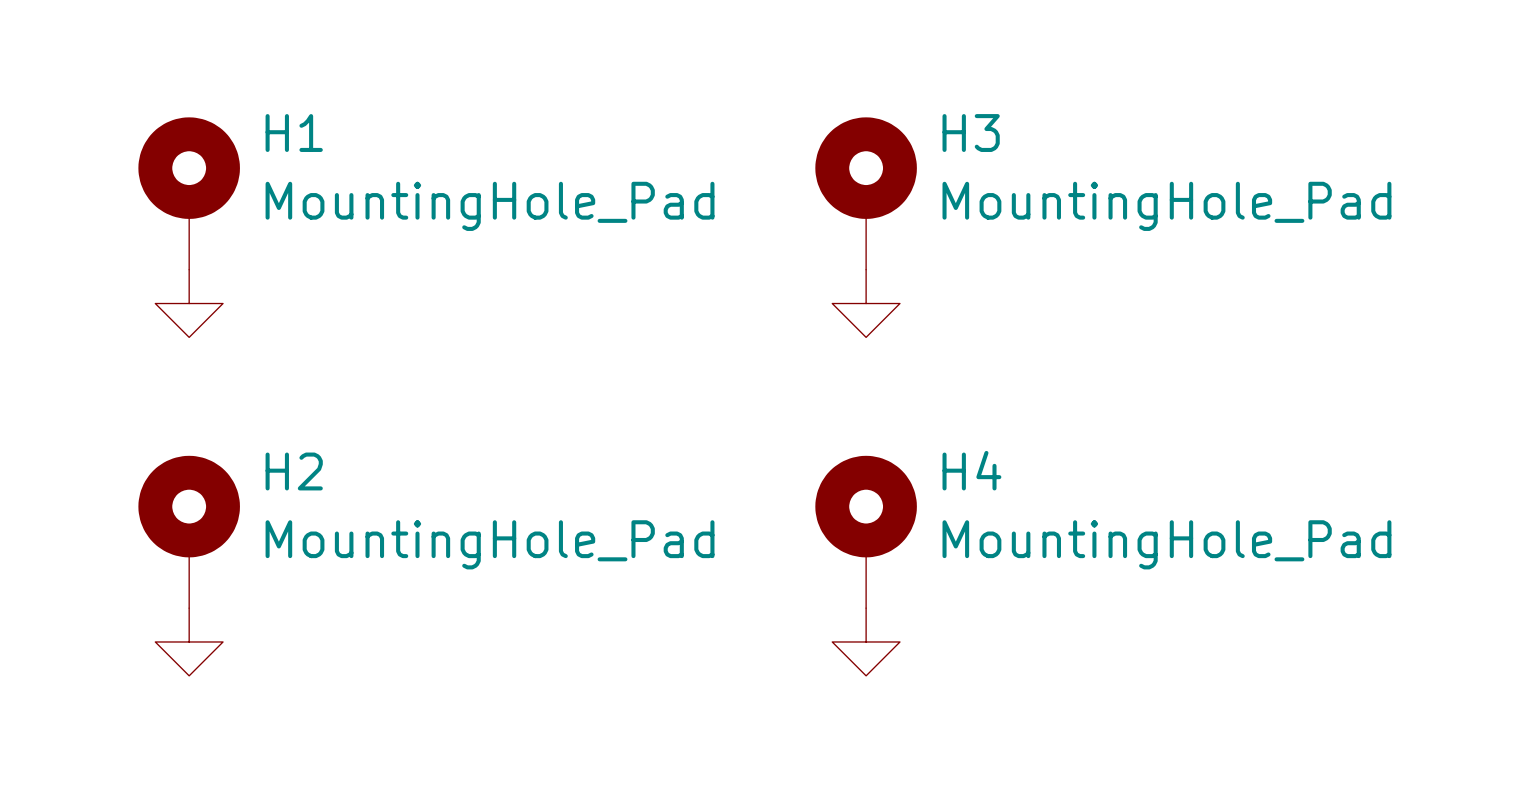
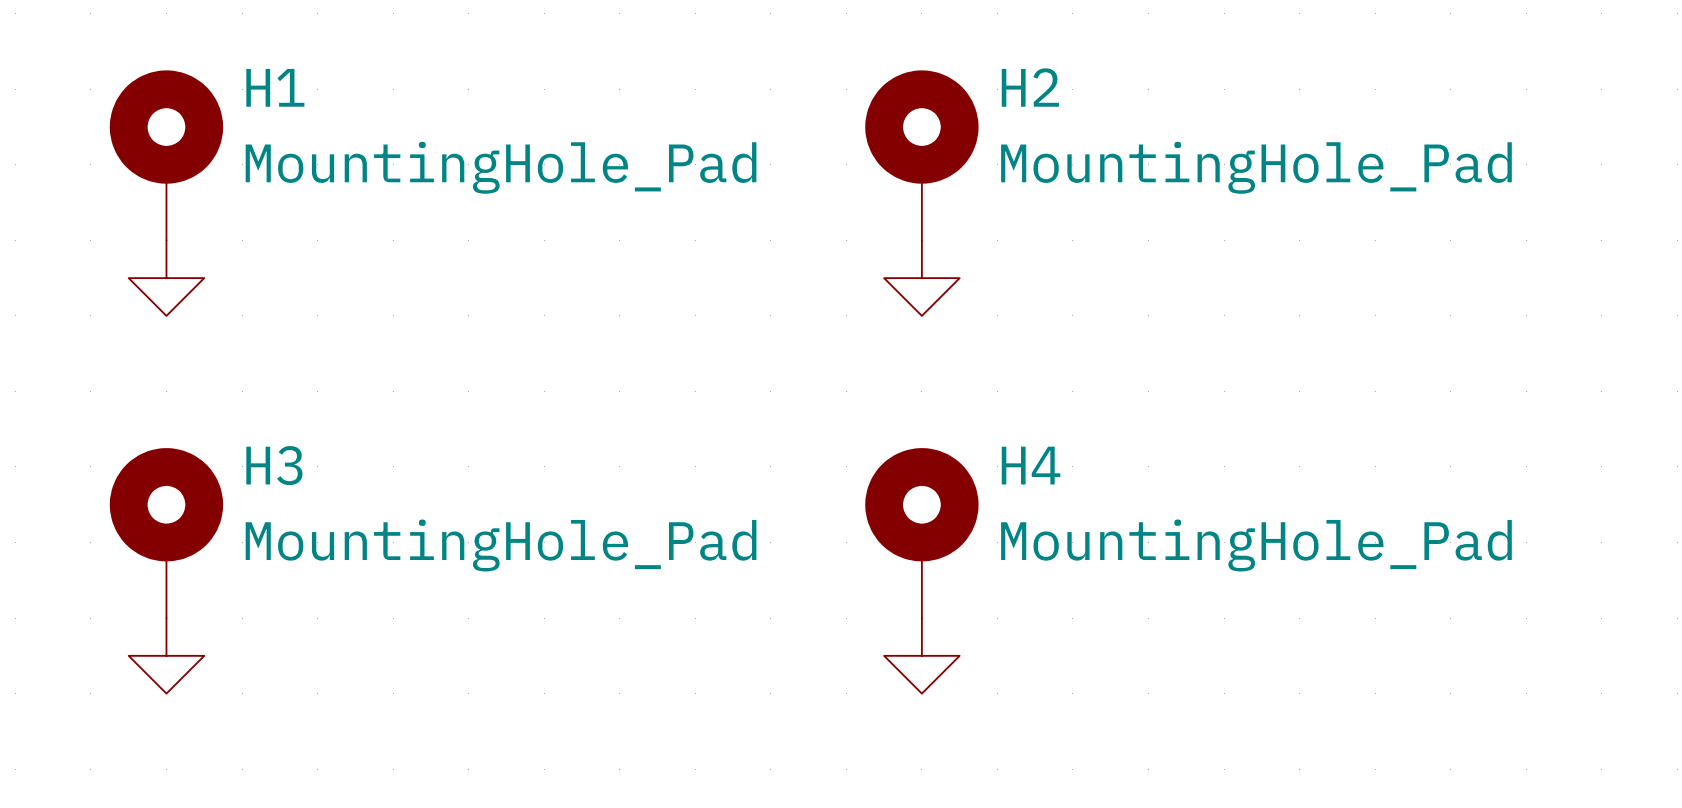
H3 name: H3 (971, 133) -> H2 (1030, 87)
H2 name: H2 (294, 471) -> H3 (274, 465)

